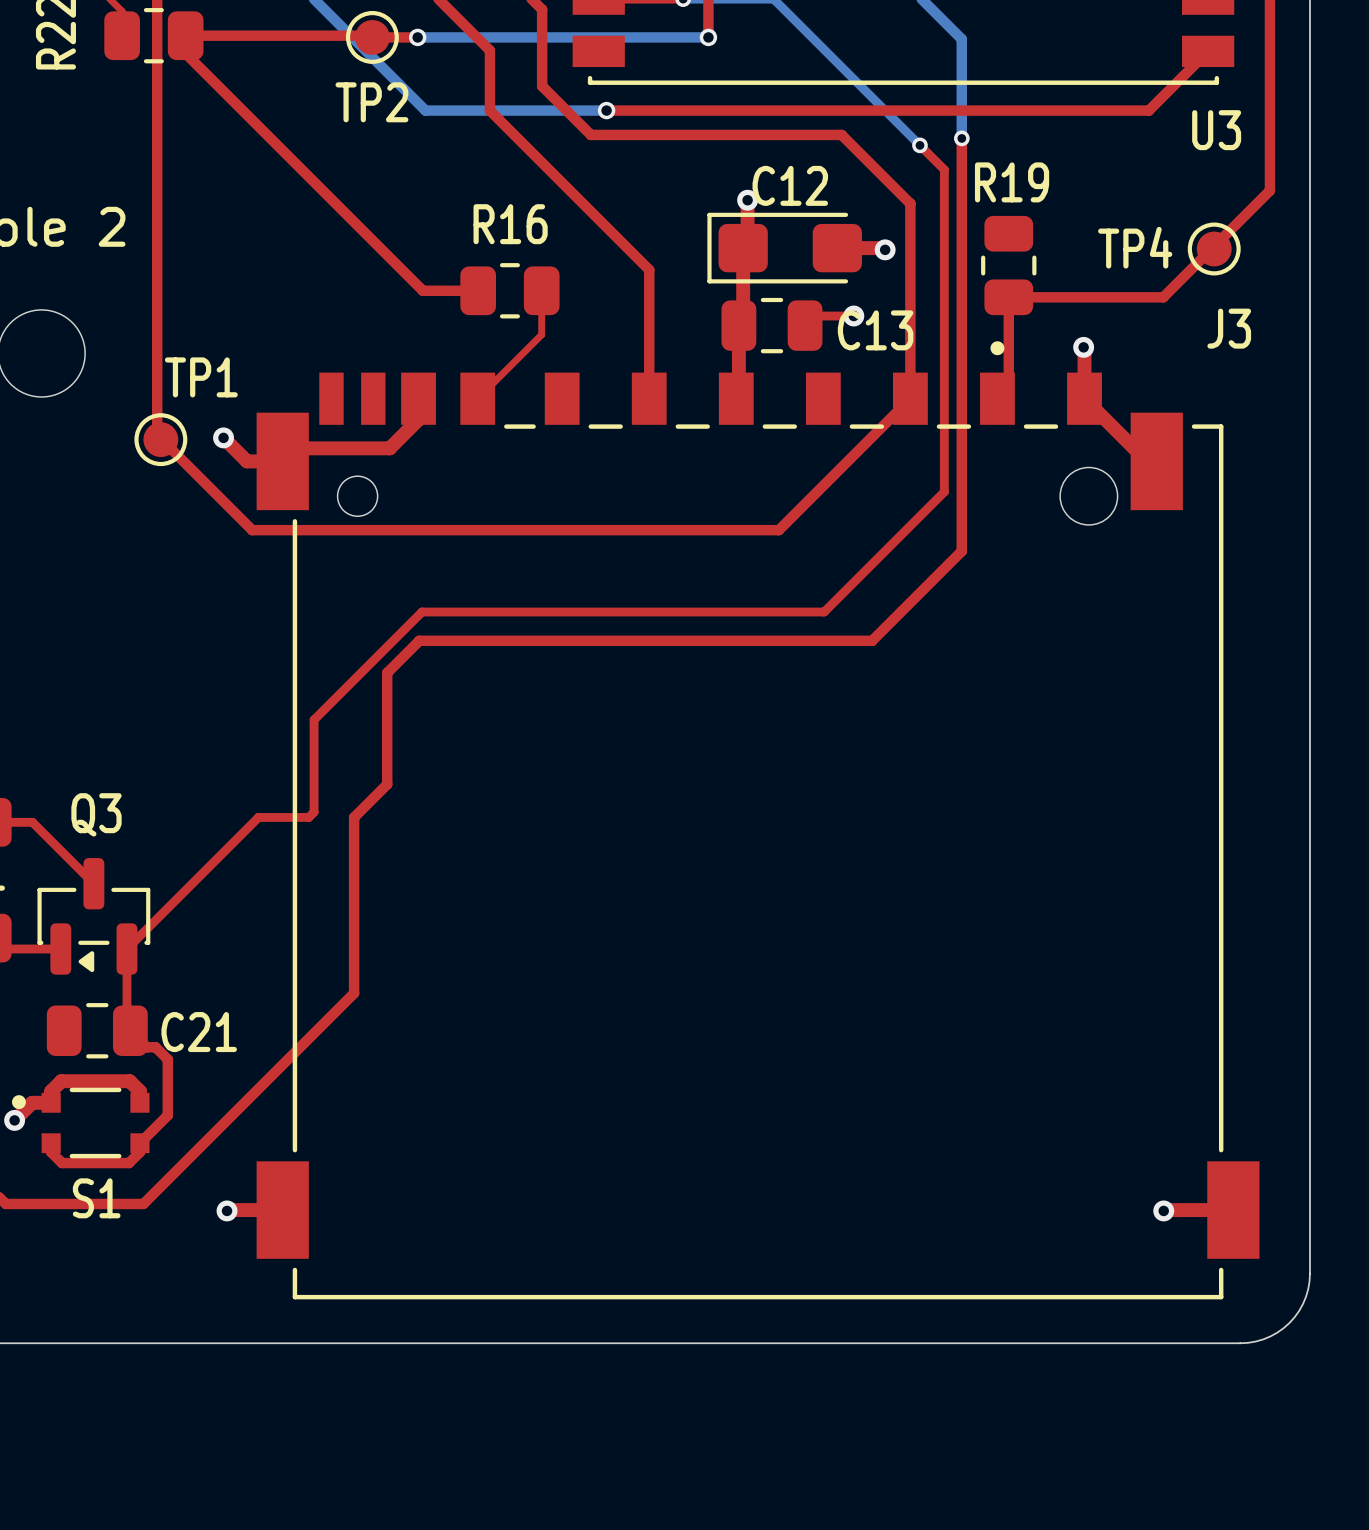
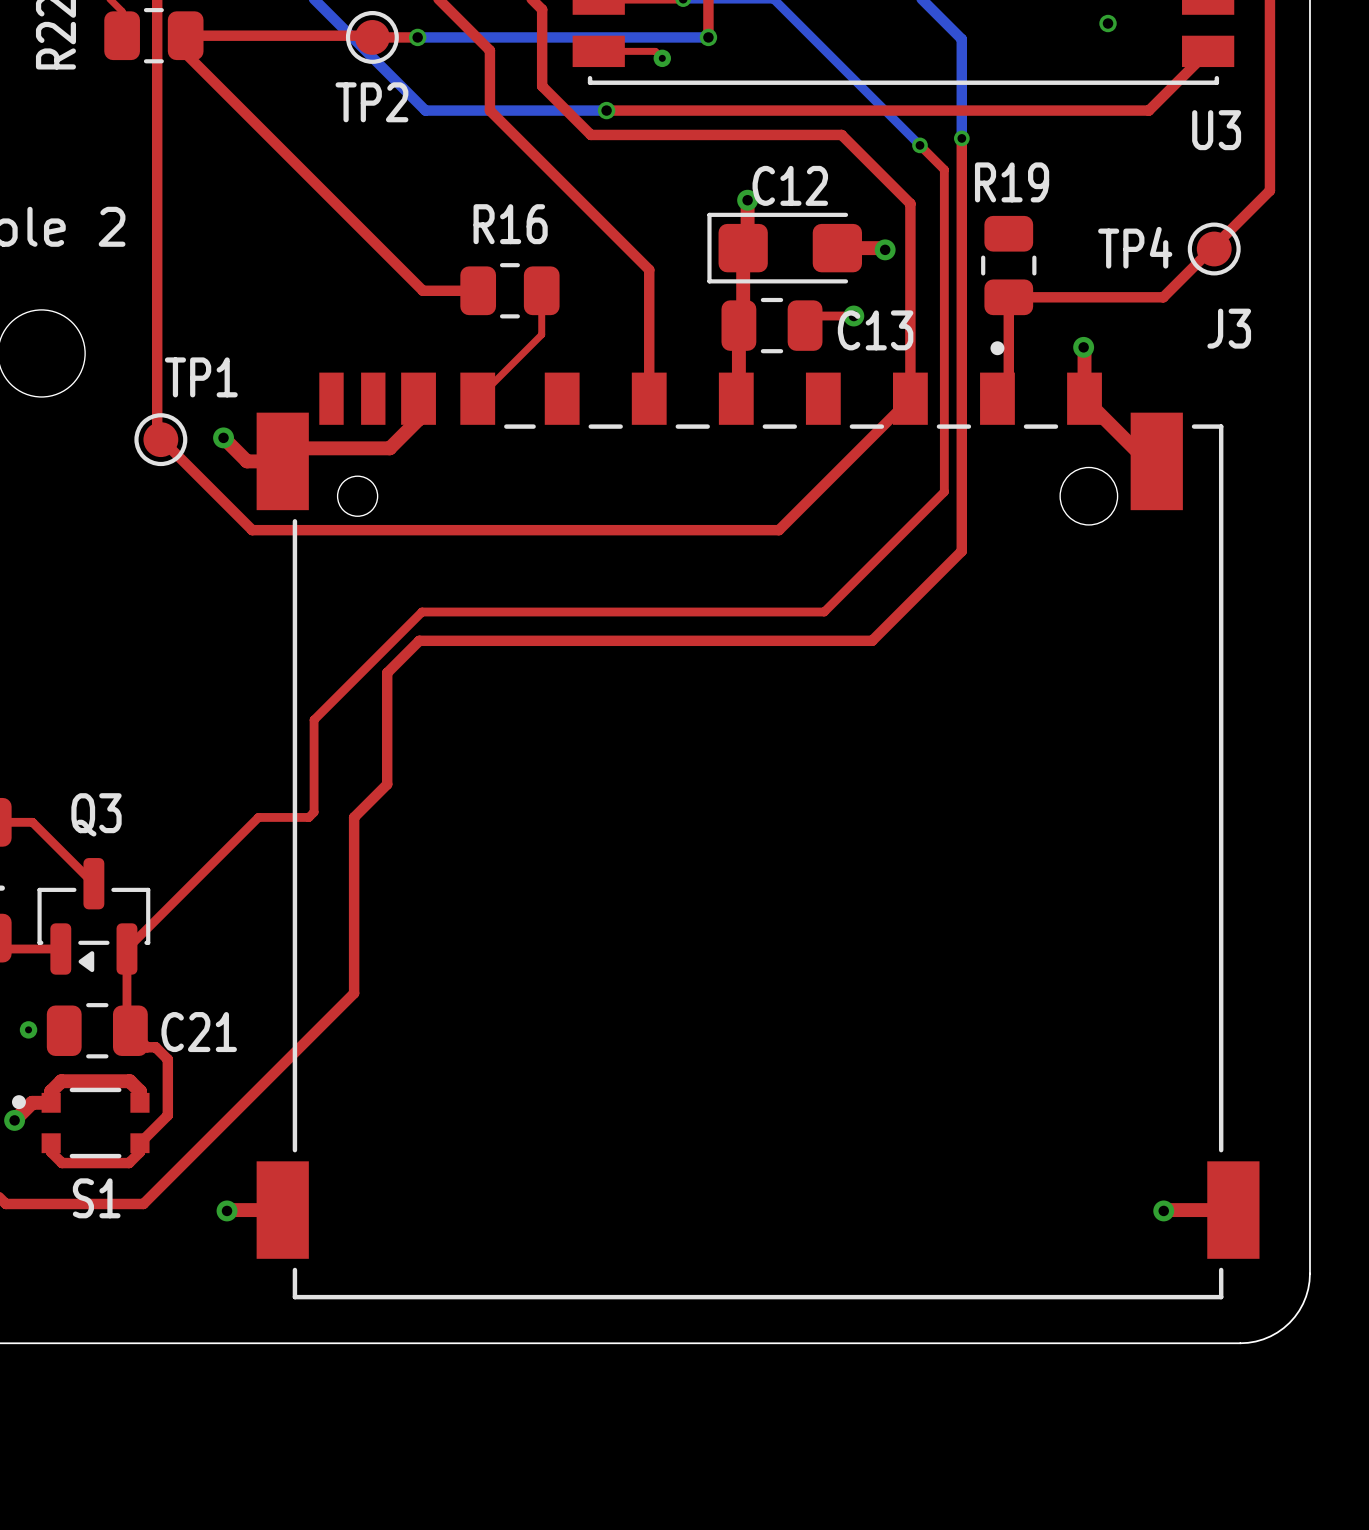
via: none -> (1108, 23)
top track: none -> (598, 51) (655, 51) (662, 58)
via: none -> (662, 58)
via: none -> (28, 1029)

